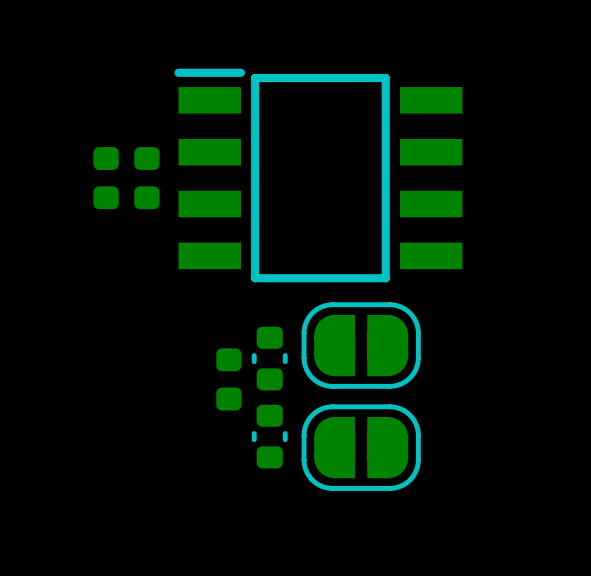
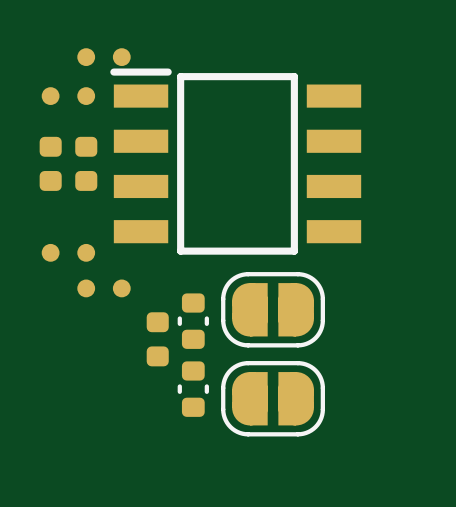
part: none -> (104, 57)
part: none -> (68, 96)
part: none -> (68, 252)
part: none -> (104, 288)

